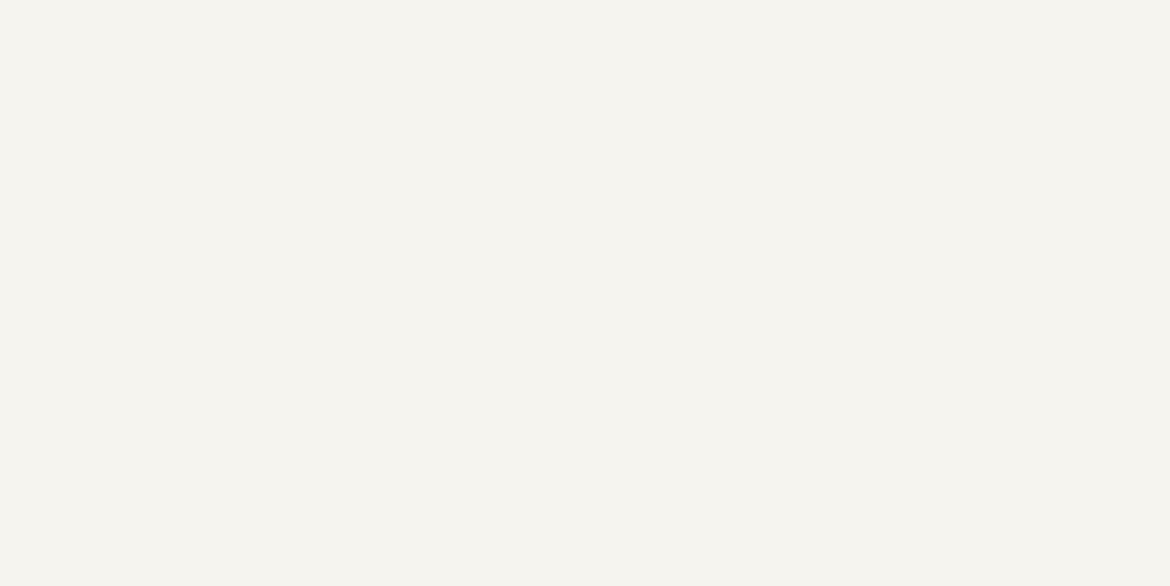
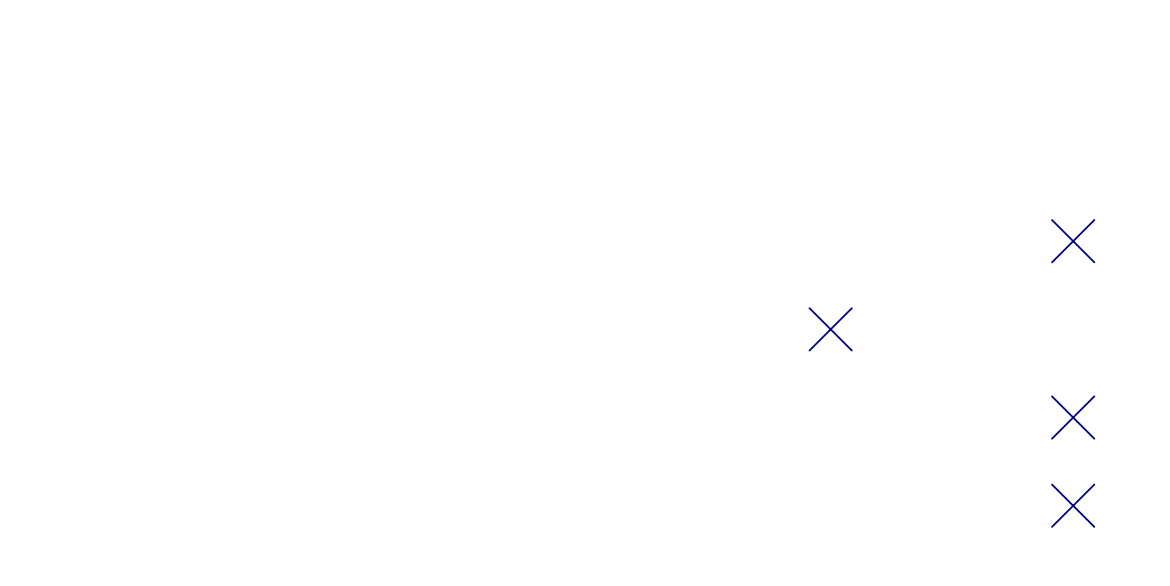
no-connect mark: none -> (1073, 241)
no-connect mark: none -> (830, 329)
no-connect mark: none -> (1073, 417)
no-connect mark: none -> (1073, 505)

